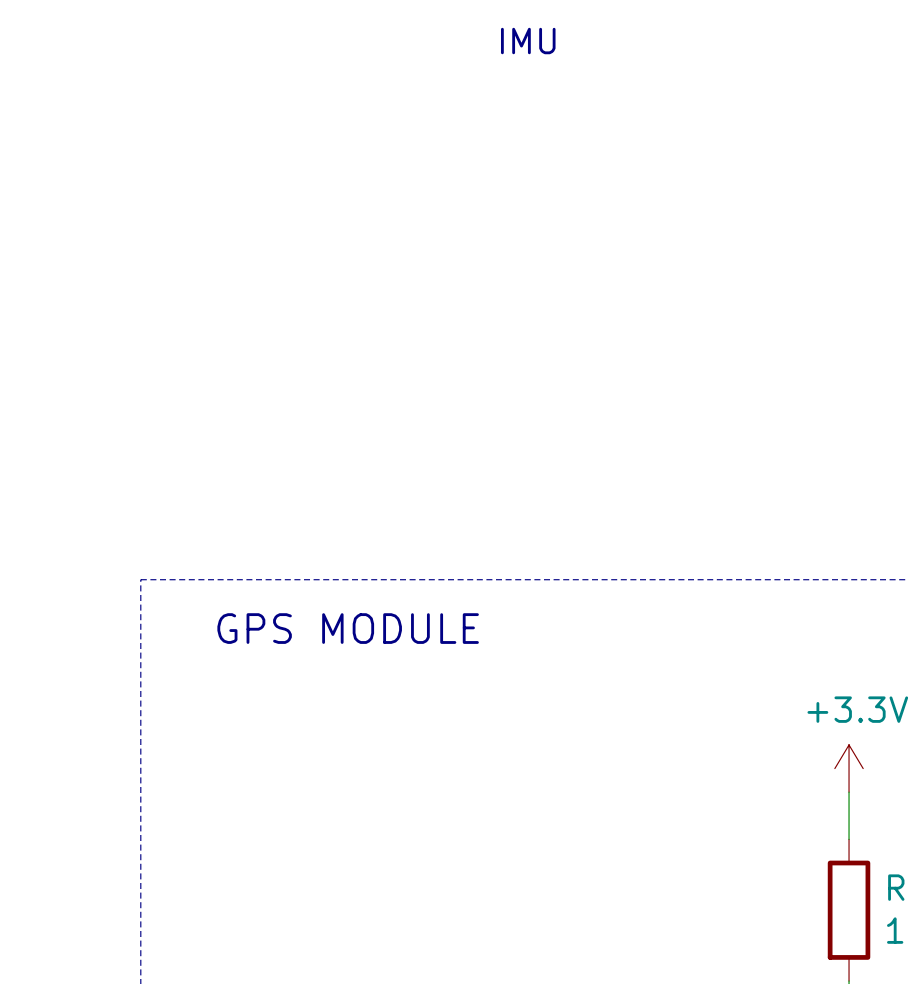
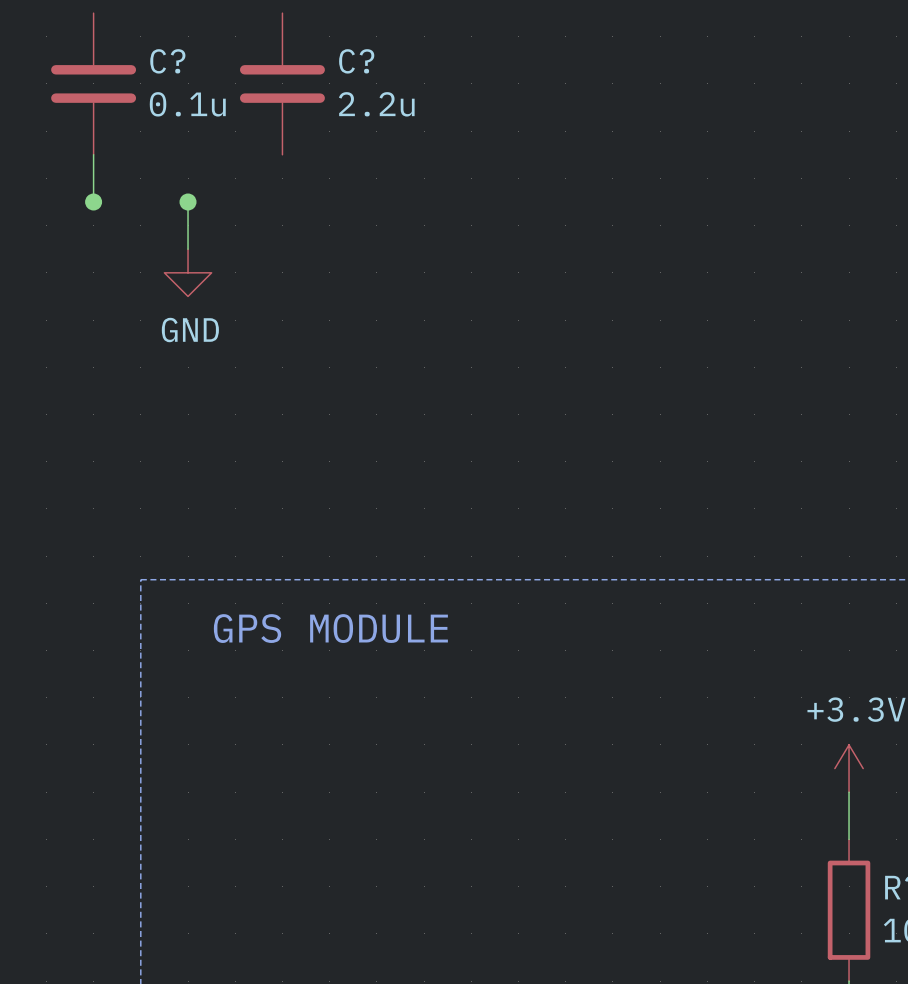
text: IMU (528, 41) -> none
C?: none -> 0.1u (93, 83)
C?: none -> 2.2u (282, 83)
wire: none -> (93, 154) (93, 202)
junction: none -> (93, 202)
wire: none -> (188, 202) (188, 249)
junction: none -> (188, 202)
power symbol: none -> GND (188, 272)

